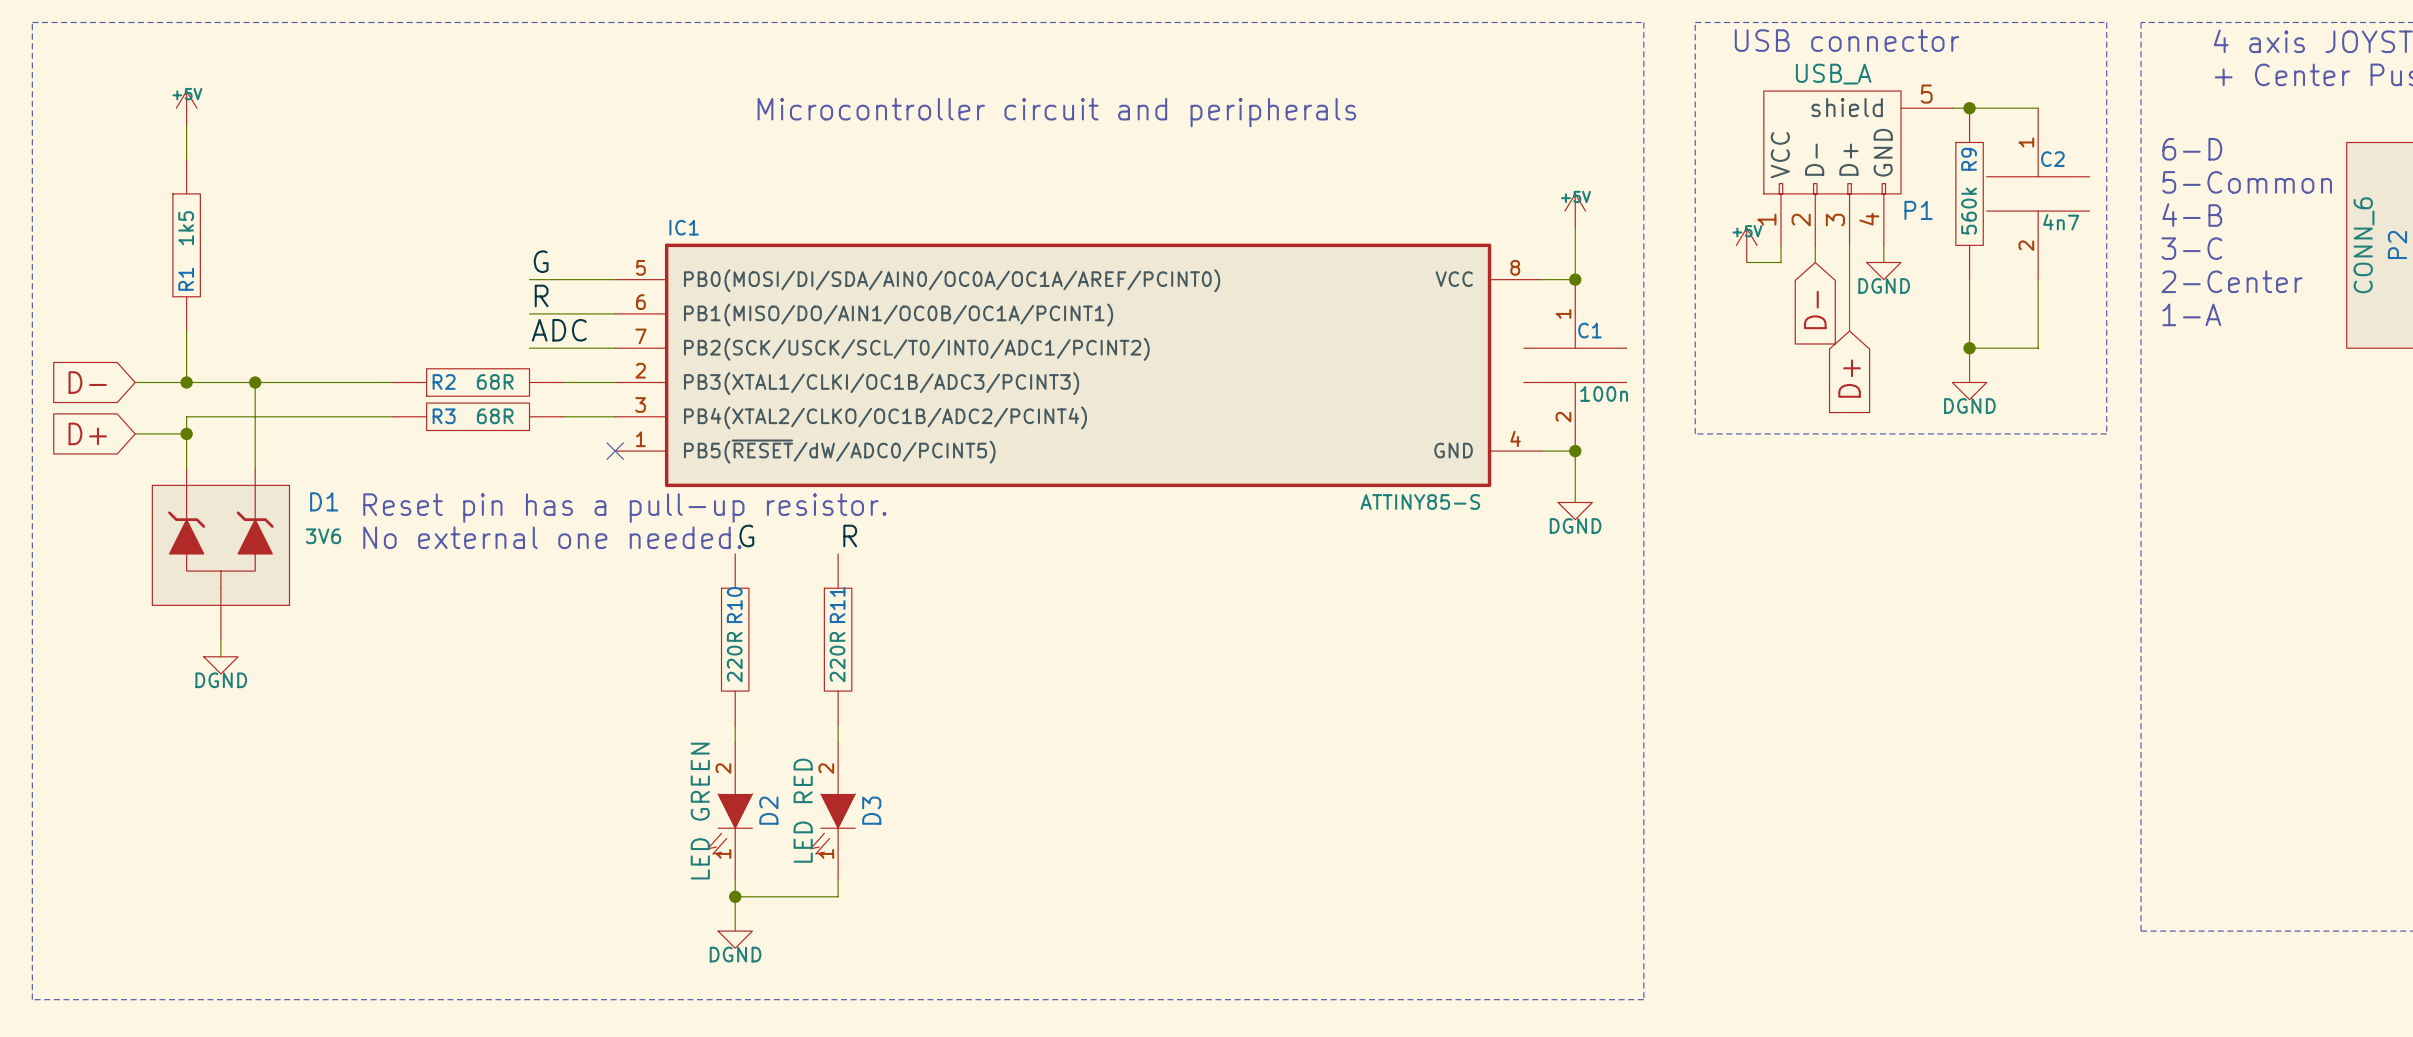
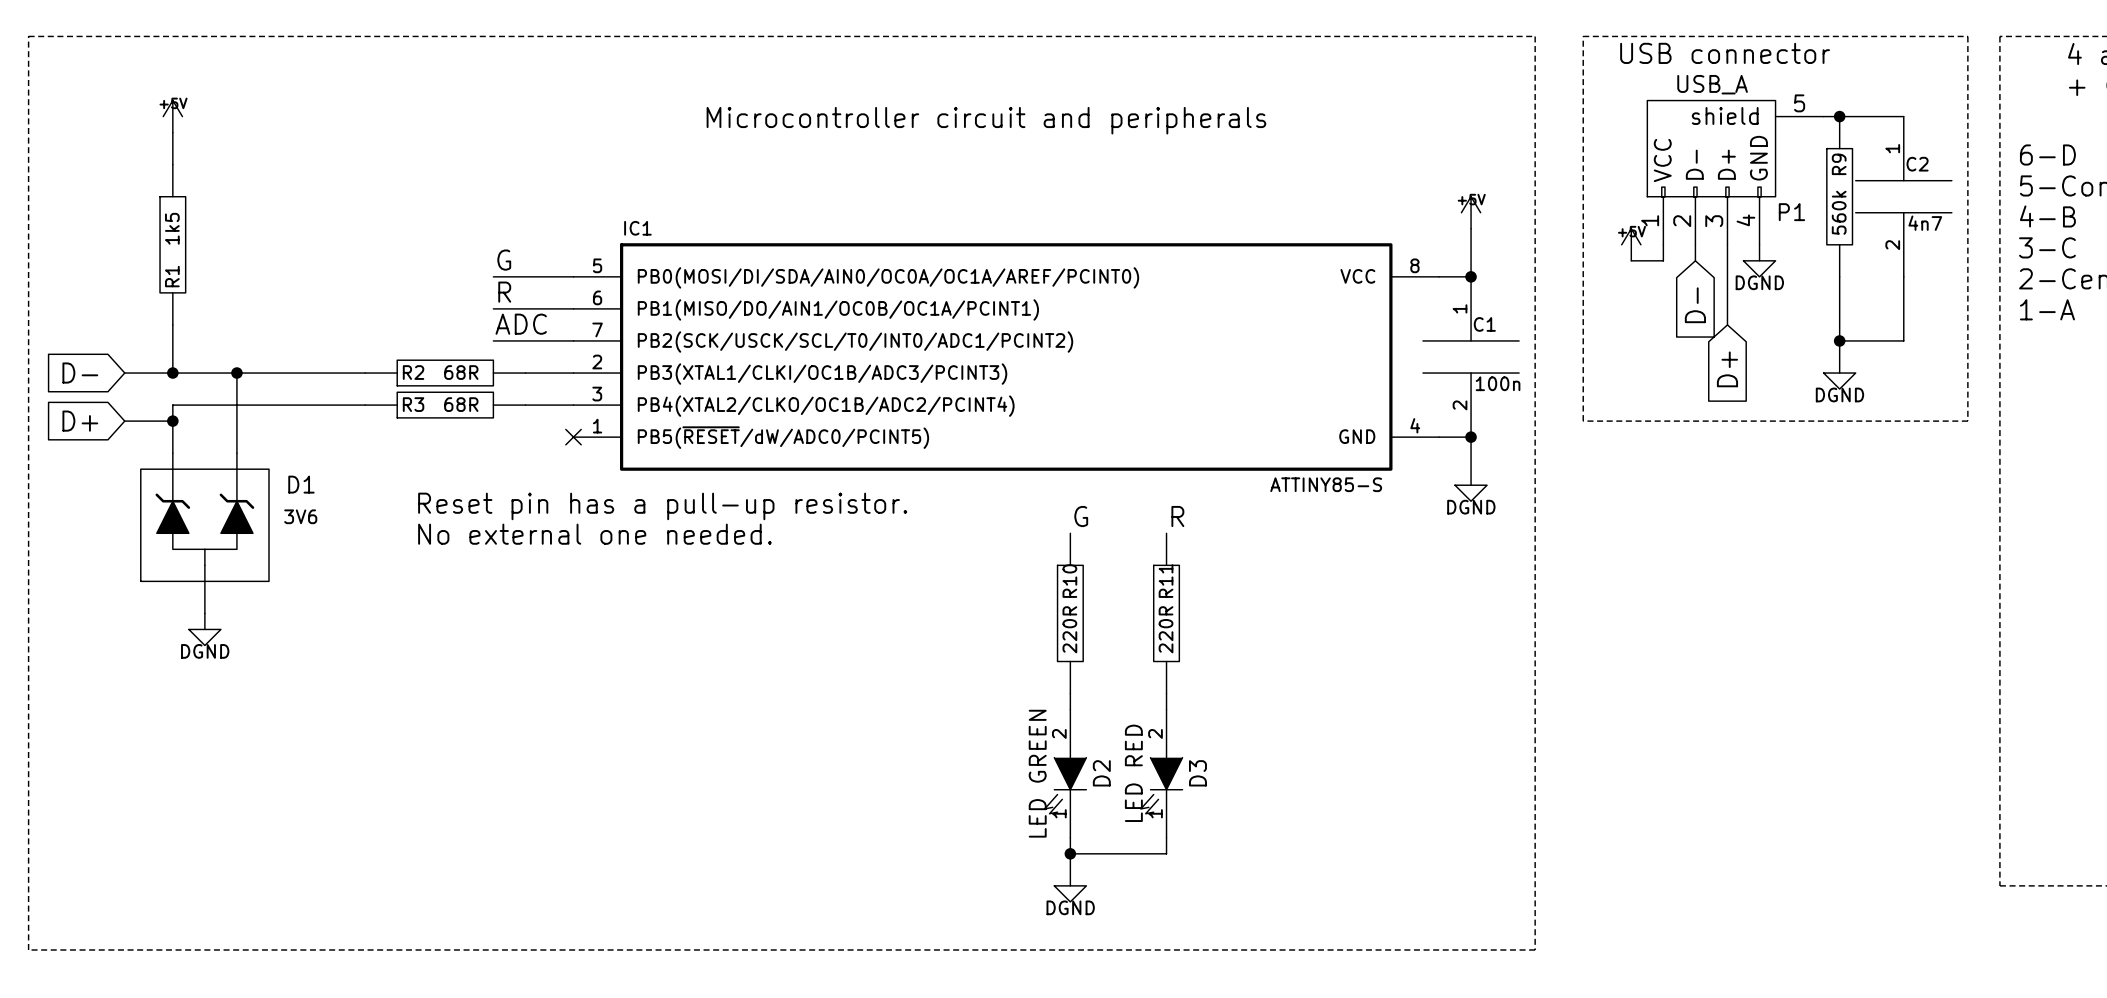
text position: Reset pin has a pull-up resistor. (624, 508) -> Reset pin has a pull-up resistor. (662, 506)
label: G (746, 535) -> none
label: R (850, 535) -> none
label: none -> G (1081, 516)
label: none -> R (1177, 516)
text position: No external one needed. (552, 537) -> No external one needed. (594, 534)
R10 position: (735, 639) -> (1070, 613)
R11 position: (838, 639) -> (1166, 613)
wire: (735, 725) (735, 742) -> none
wire: (838, 725) (838, 742) -> (1070, 693) (1070, 709)
wire: none -> (1166, 693) (1166, 709)
D2 position: (730, 811) -> (1065, 773)
D3 position: (832, 811) -> (1161, 773)
wire: (735, 879) (735, 931) -> none
wire: (838, 879) (838, 896) (735, 896) -> none
wire: none -> (1070, 837) (1070, 885)
wire: none -> (1166, 837) (1166, 853) (1070, 853)
junction: (735, 896) -> none
junction: none -> (1070, 853)
power symbol: DGND (735, 939) -> none
power symbol: none -> DGND (1070, 893)

